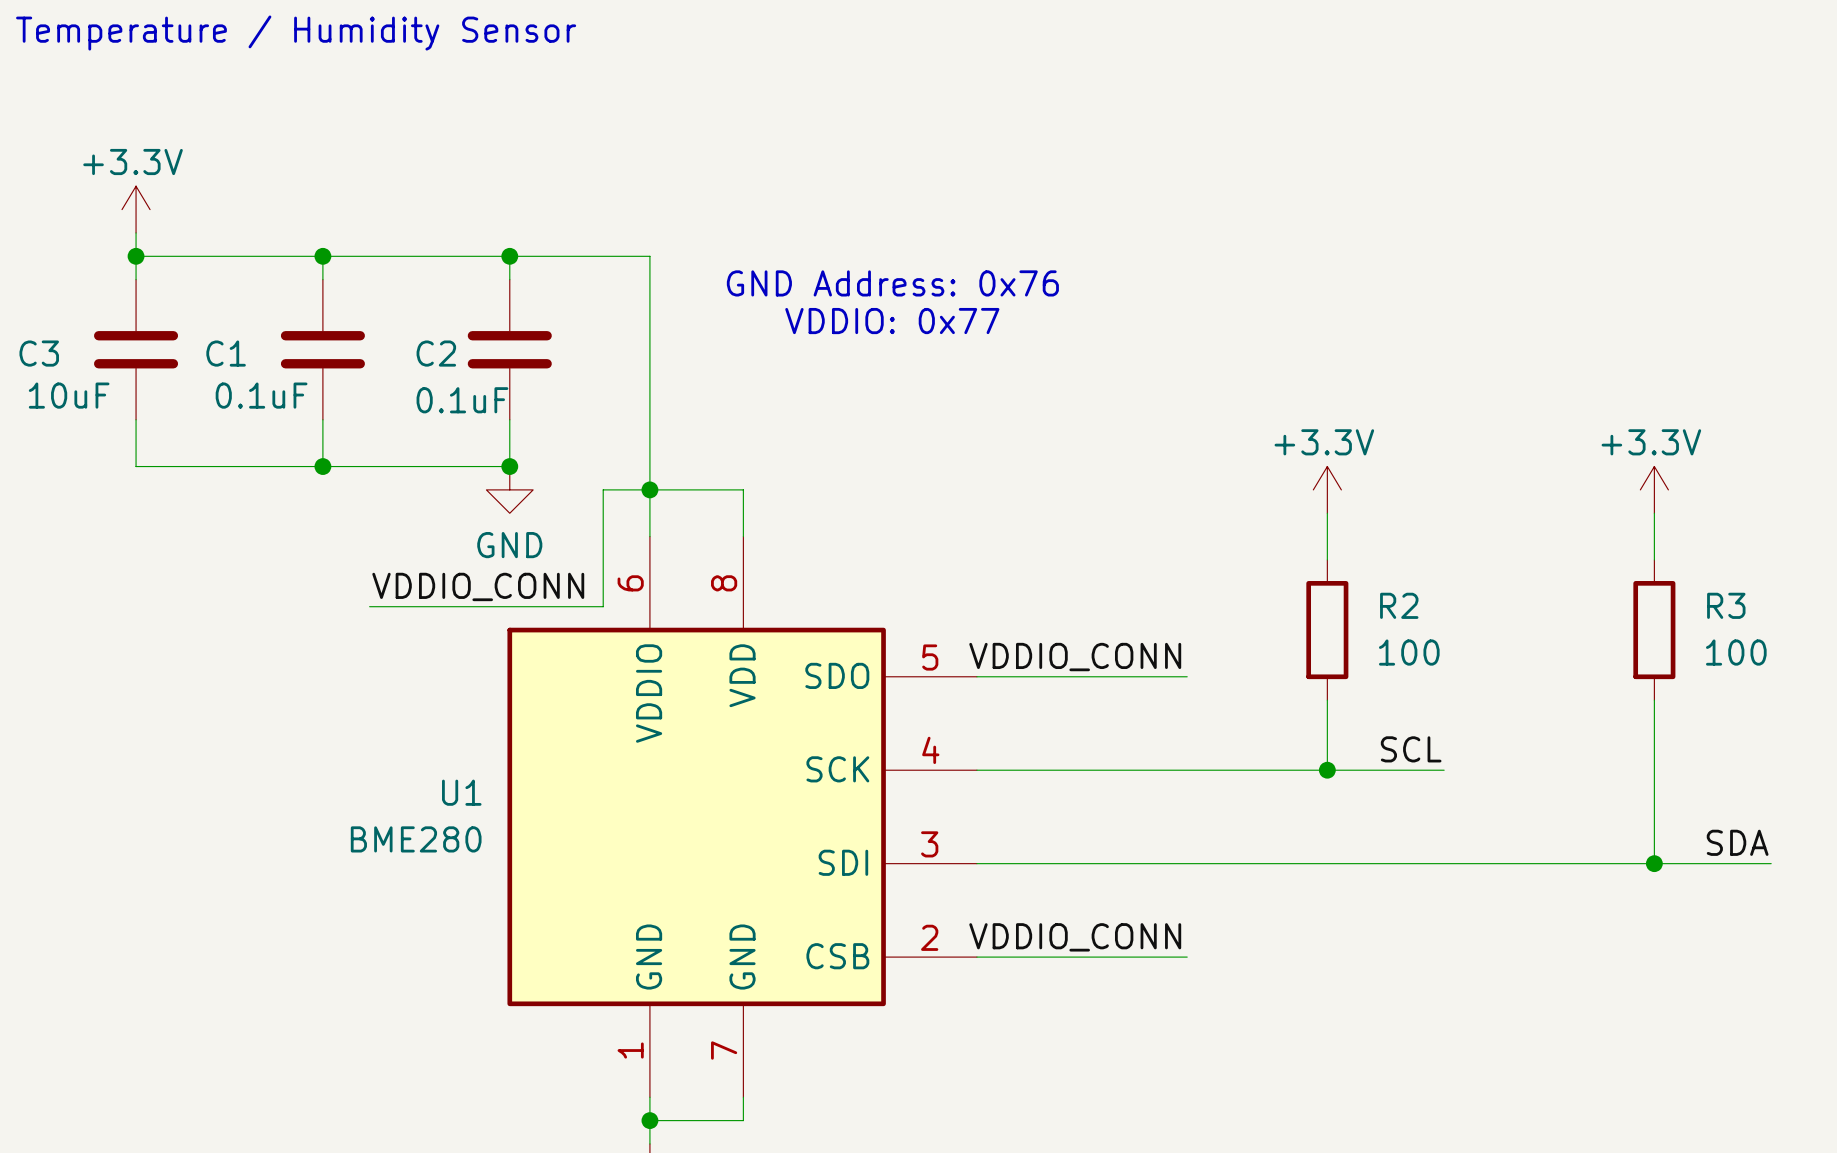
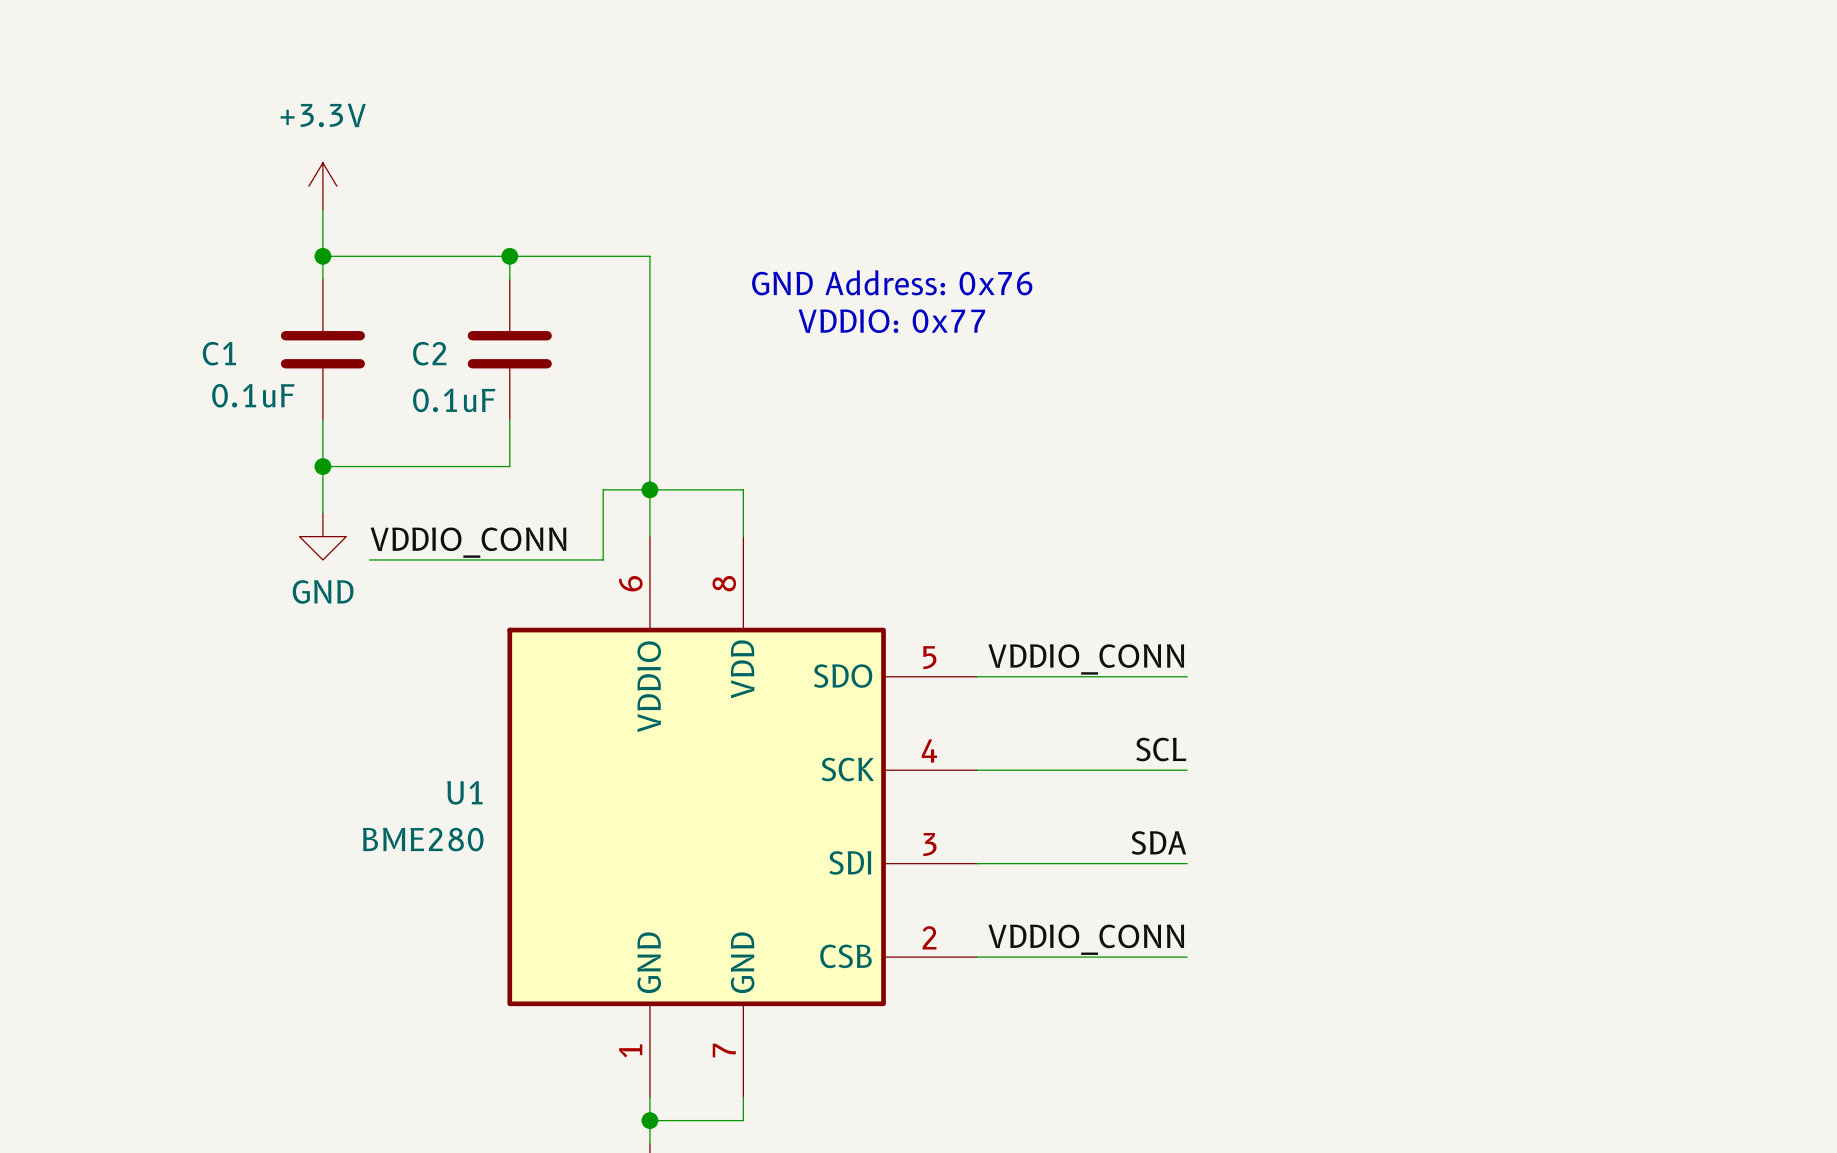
text: Temperature / Humidity Sensor (296, 33) -> none
power symbol text position: +3.3V (133, 162) -> +3.3V (323, 115)
power symbol position: +3.3V (136, 209) -> +3.3V (322, 186)
wire: (136, 232) (136, 279) -> none
wire: (136, 256) (322, 256) -> (322, 209) (322, 256)
junction: (136, 256) -> none
C3: 10uF (136, 349) -> none
wire: (136, 419) (136, 466) (322, 466) -> (322, 513) (322, 466)
junction: (509, 466) -> none
power symbol position: GND (509, 489) -> GND (322, 536)
power symbol: +3.3V (1327, 489) -> none
power symbol: +3.3V (1654, 489) -> none
wire: (1327, 513) (1327, 559) -> none
wire: (1654, 513) (1654, 559) -> none
wire: (603, 559) (603, 606) (369, 606) -> (603, 559) (369, 559)
label position: VDDIO_CONN (478, 586) -> VDDIO_CONN (468, 542)
R2: 100 (1327, 630) -> none
R3: 100 (1654, 630) -> none
wire: (1327, 700) (1327, 770) -> none
wire: (1654, 700) (1654, 863) -> none
label position: SCL (1411, 749) -> SCL (1161, 749)
wire: (1187, 770) (1444, 770) -> none
junction: (1327, 770) -> none
label: none -> SDA (1158, 842)
label: SDA (1737, 842) -> none
wire: (1187, 863) (1771, 863) -> none
junction: (1654, 863) -> none

